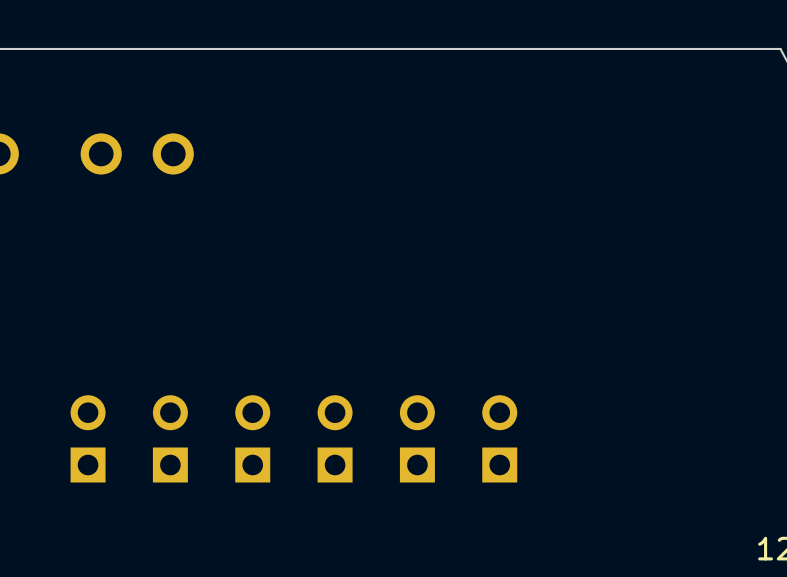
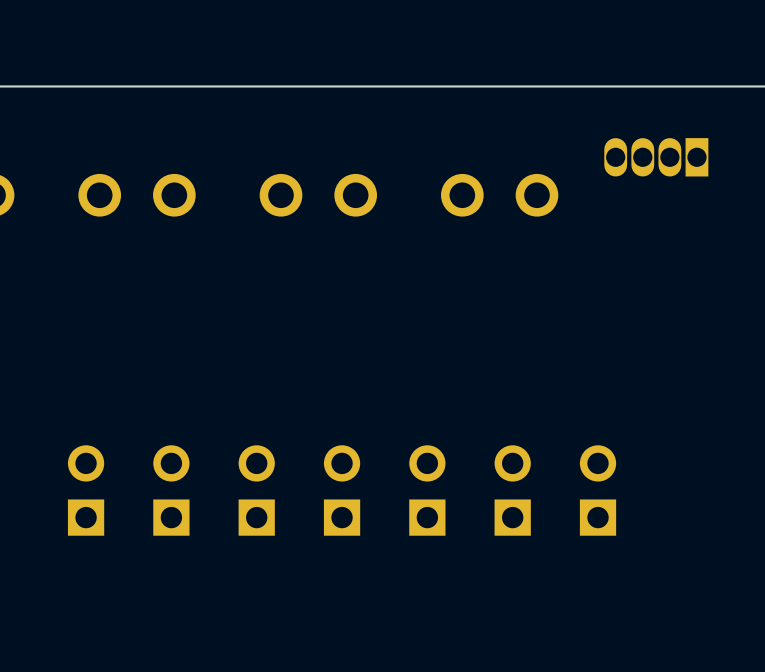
part: none -> (656, 157)
part: none -> (318, 195)
part: none -> (499, 195)
part: none -> (598, 490)

